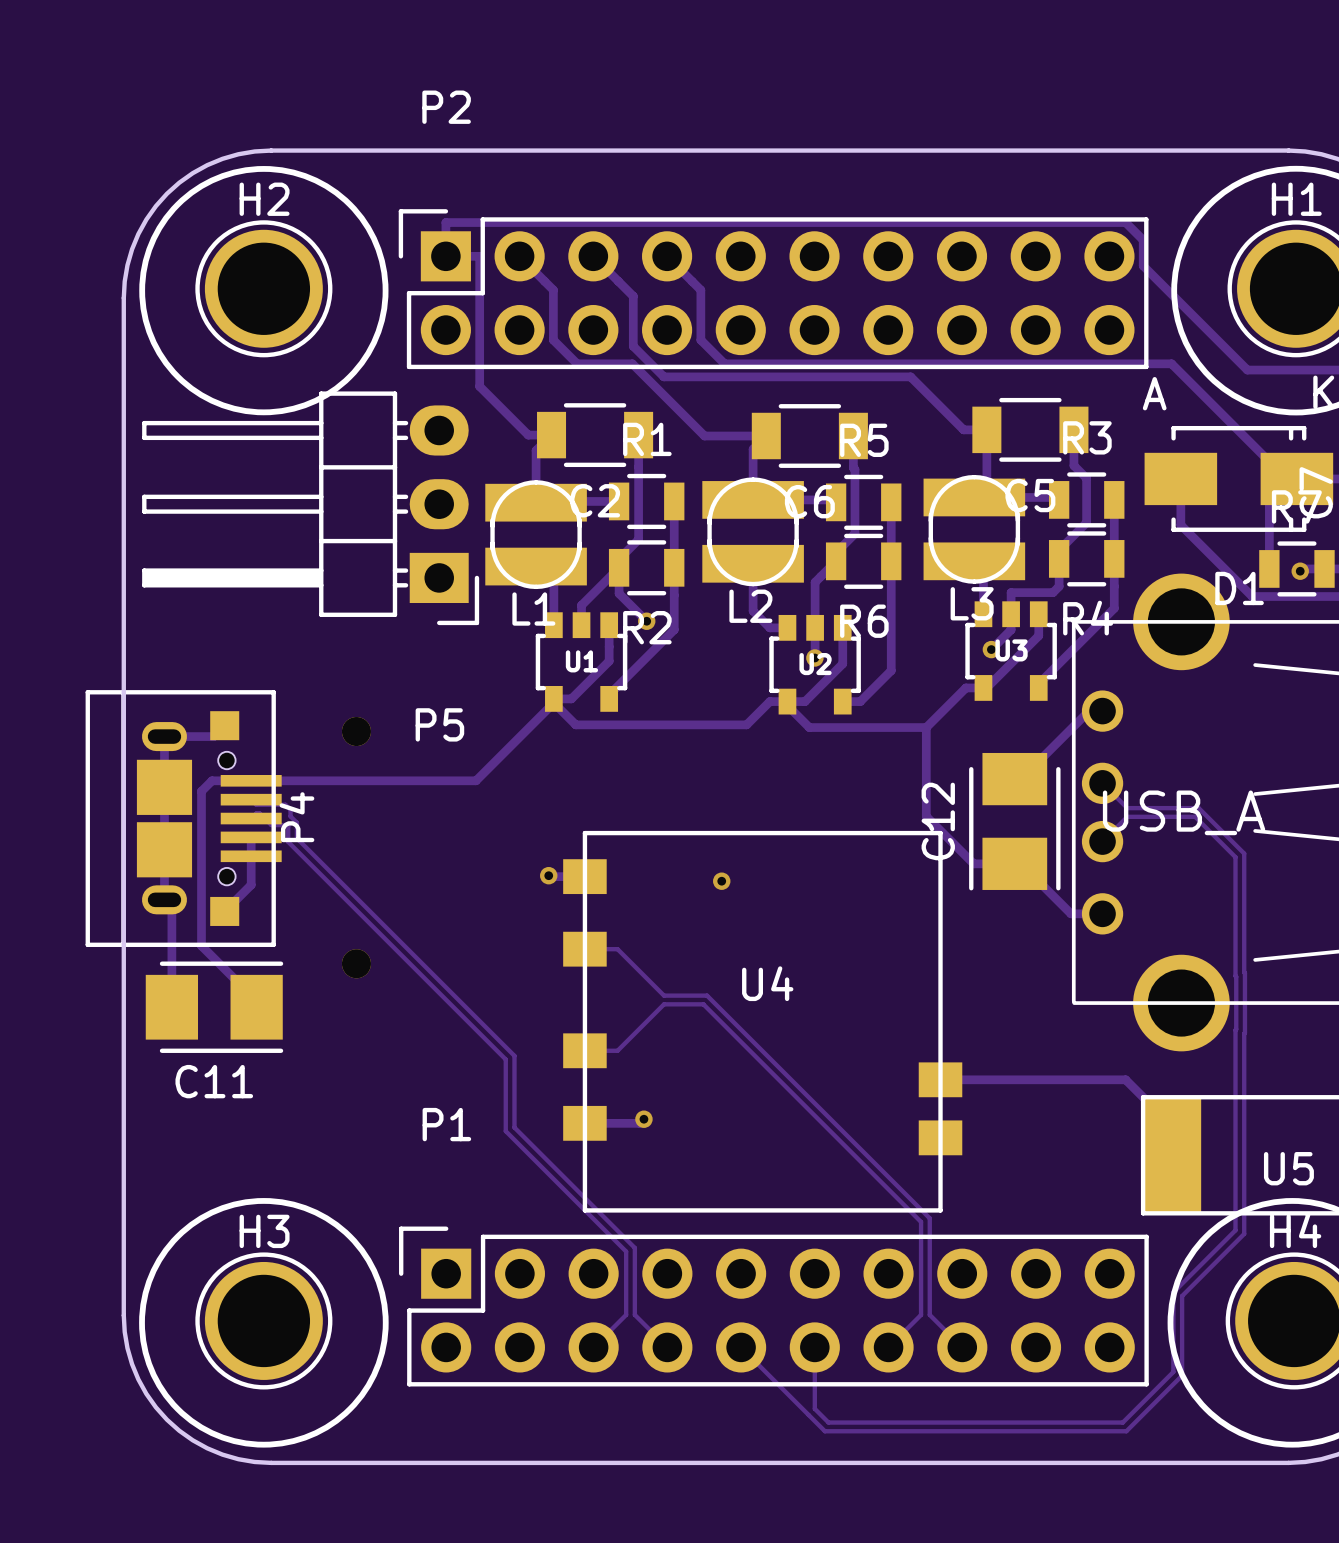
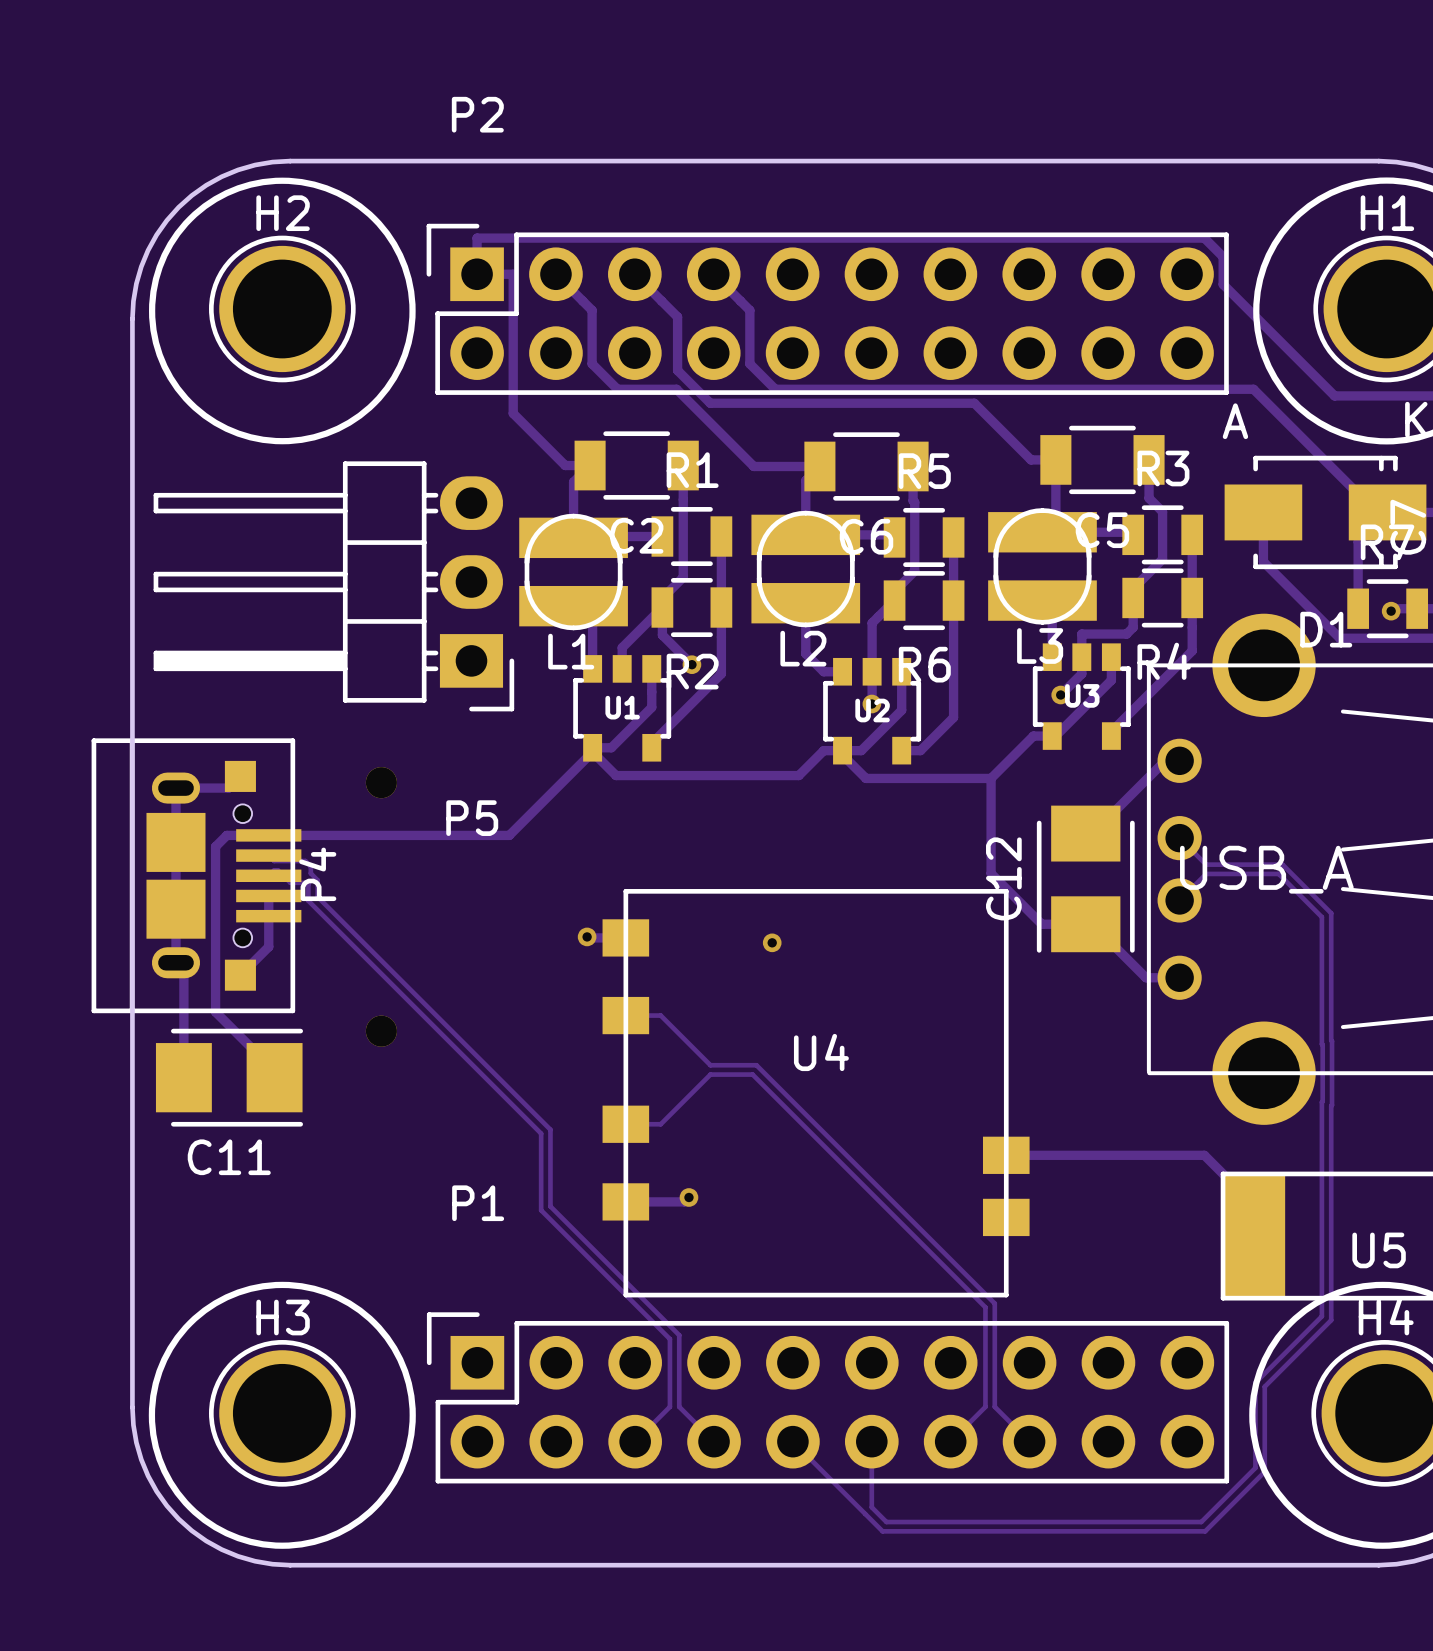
P5 position: (310, 508) -> (333, 586)

